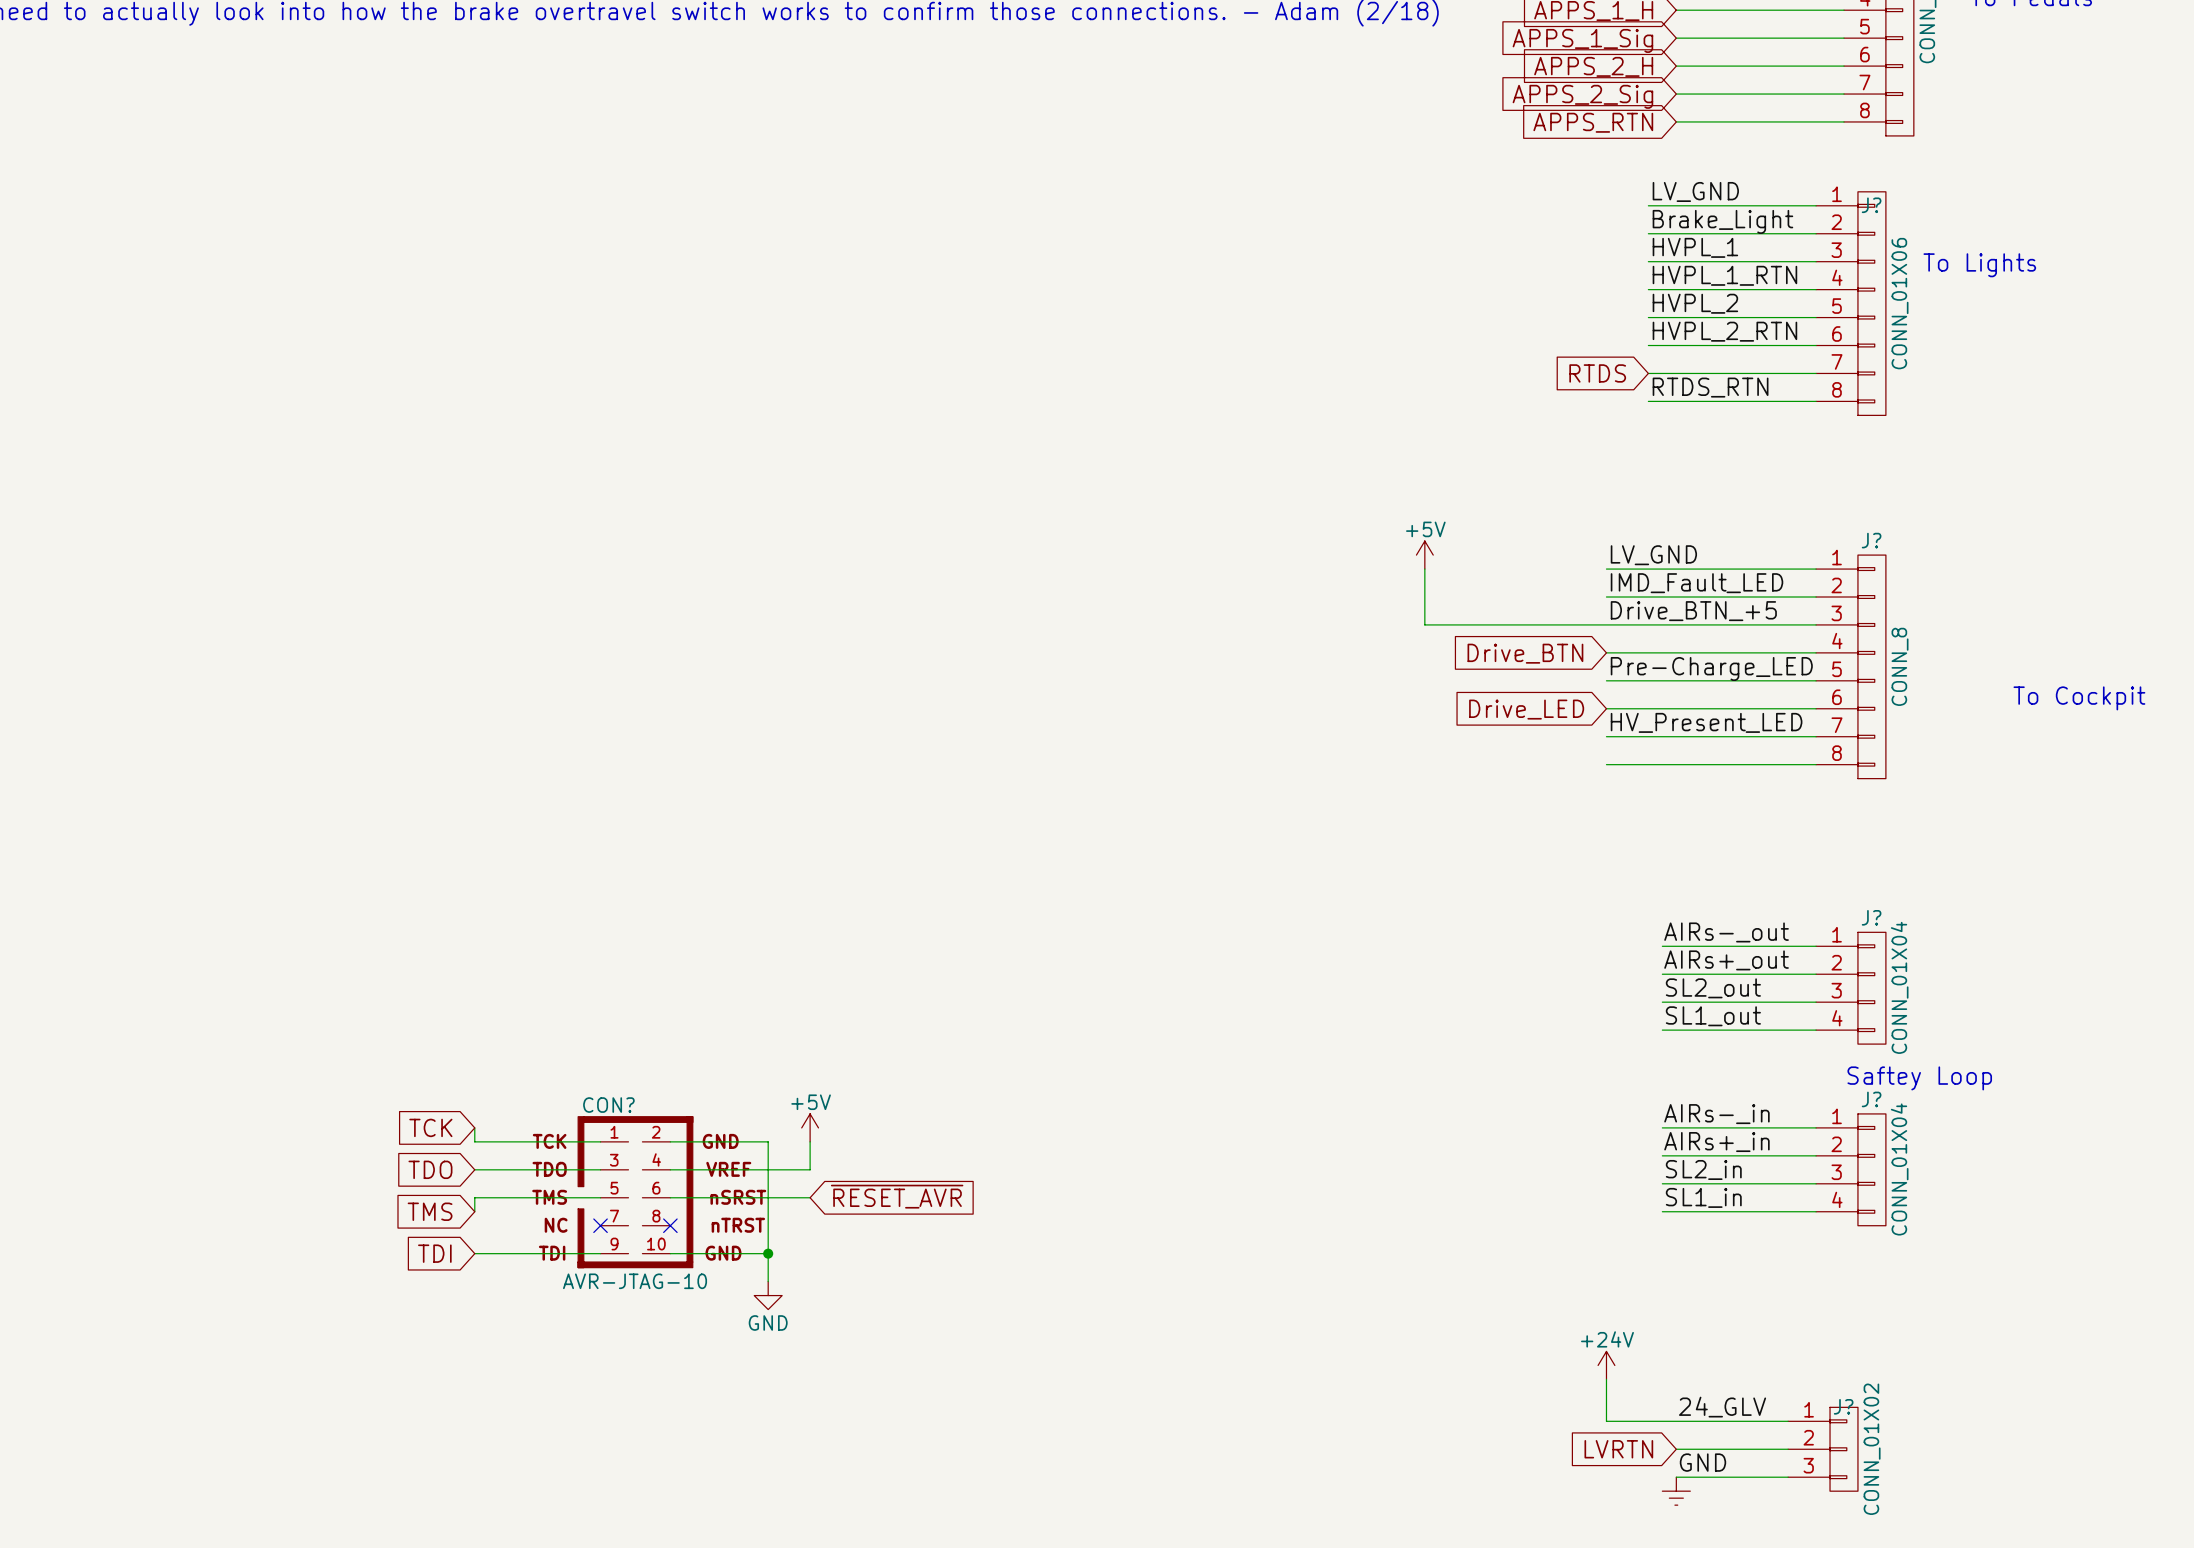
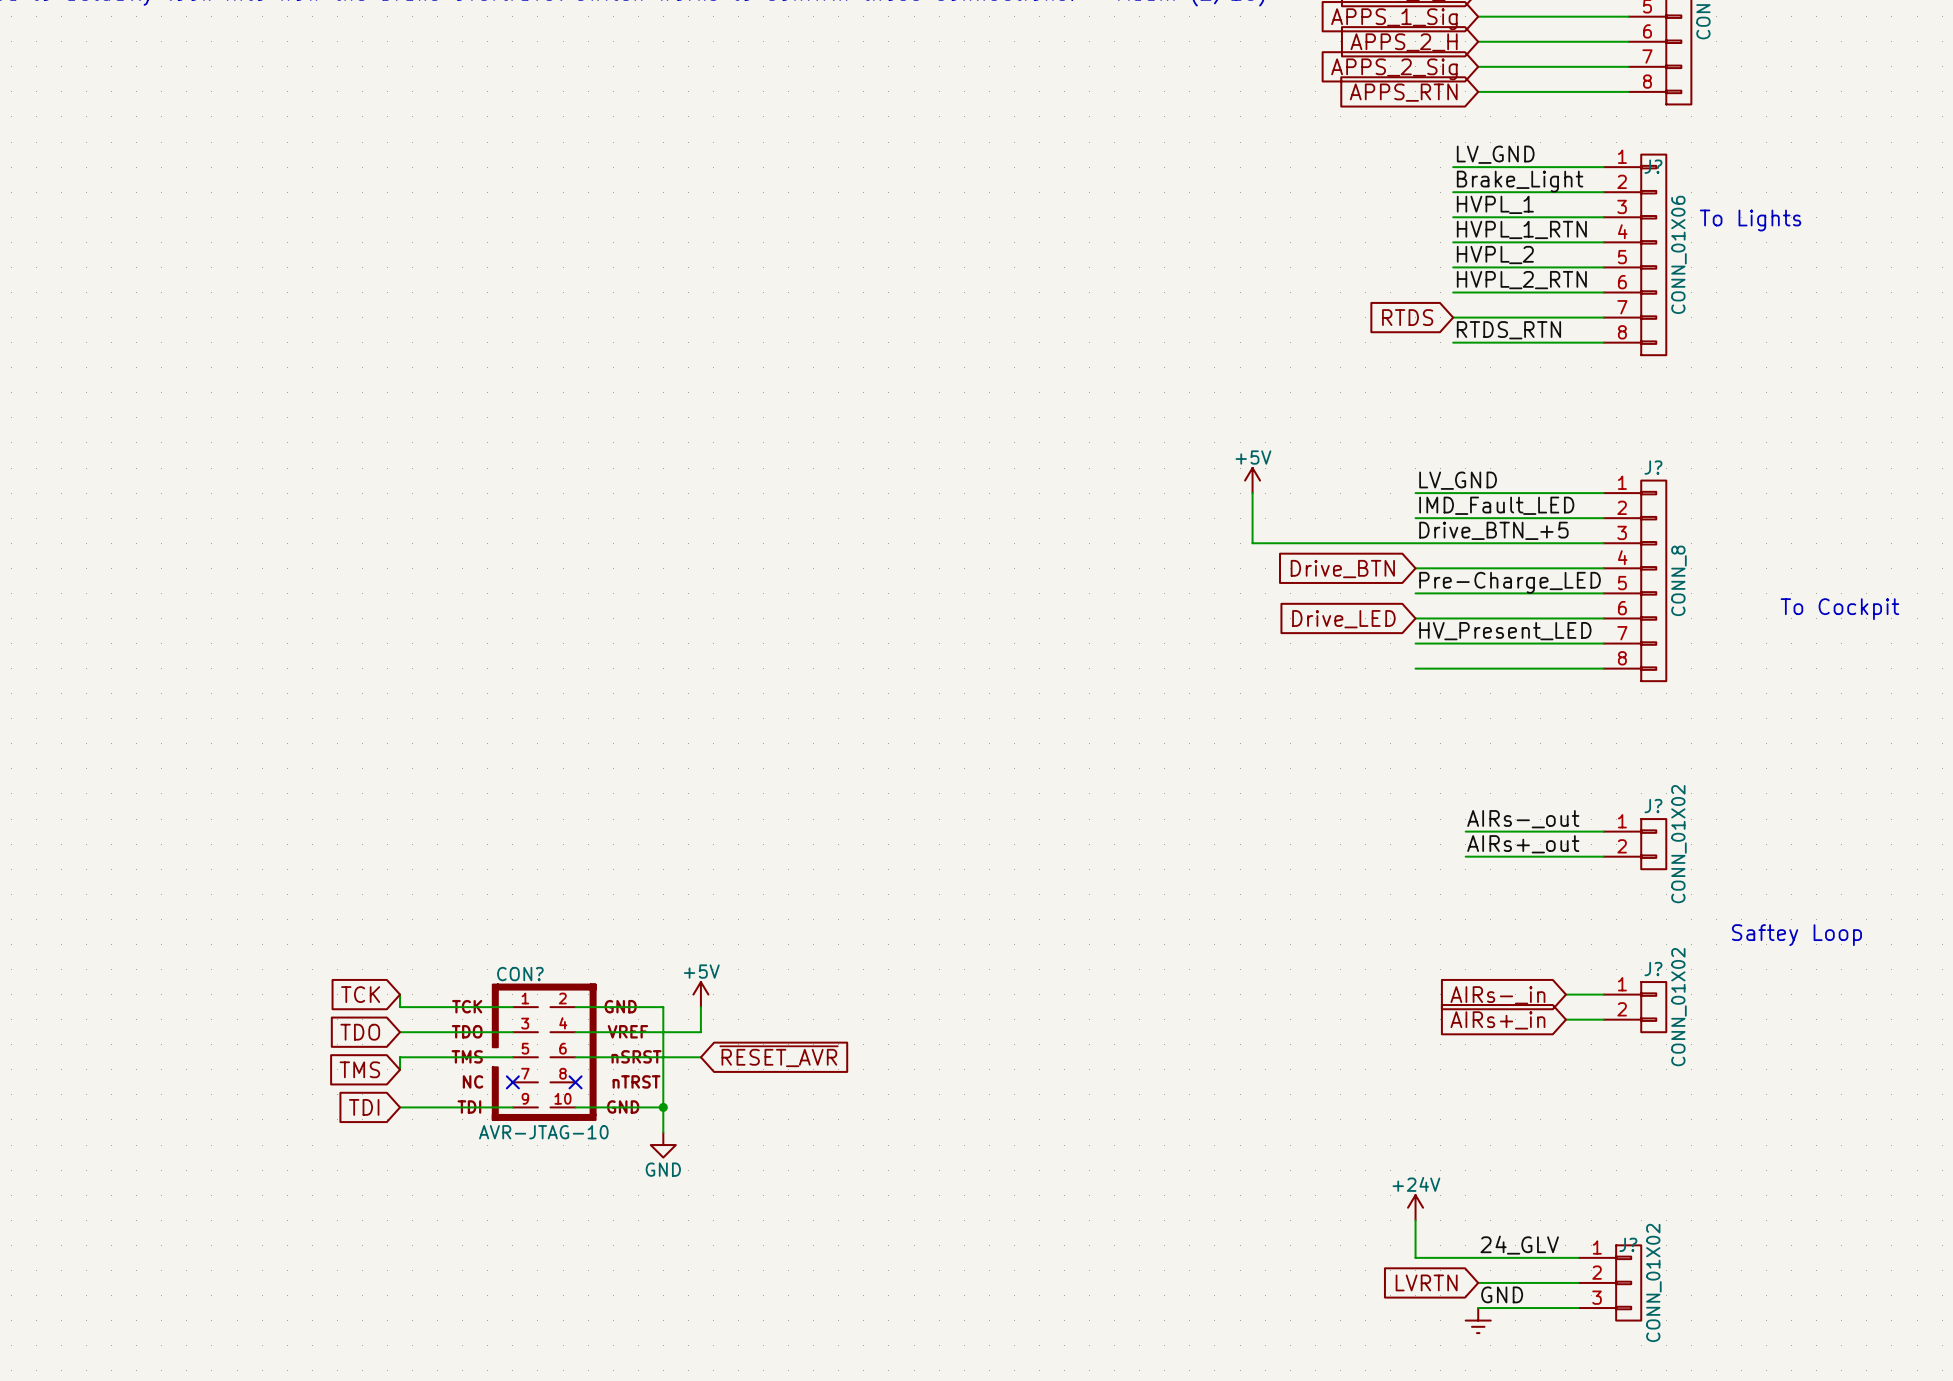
J?: none -> CONN_01X02 (1634, 844)
label: SL2_out (1713, 988) -> none
J?: CONN_01X04 (1850, 988) -> none
wire: (1662, 1002) (1816, 1002) -> none
label: SL1_out (1713, 1016) -> none
wire: (1662, 1030) (1816, 1030) -> none
text position: Saftey Loop (1919, 1078) -> Saftey Loop (1796, 935)
label: AIRs-_in (1716, 1114) -> none
wire: (1662, 1127) (1774, 1127) -> none
global label: none -> AIRs-_in (1497, 995)
J?: none -> CONN_01X02 (1634, 1007)
label: AIRs+_in (1716, 1142) -> none
wire: (1662, 1155) (1774, 1155) -> none
global label: none -> AIRs+_in (1497, 1020)
label: SL2_in (1703, 1169) -> none
J?: CONN_01X04 (1850, 1169) -> none
wire: (1662, 1183) (1816, 1183) -> none
label: SL1_in (1703, 1197) -> none
wire: (1662, 1211) (1816, 1211) -> none

